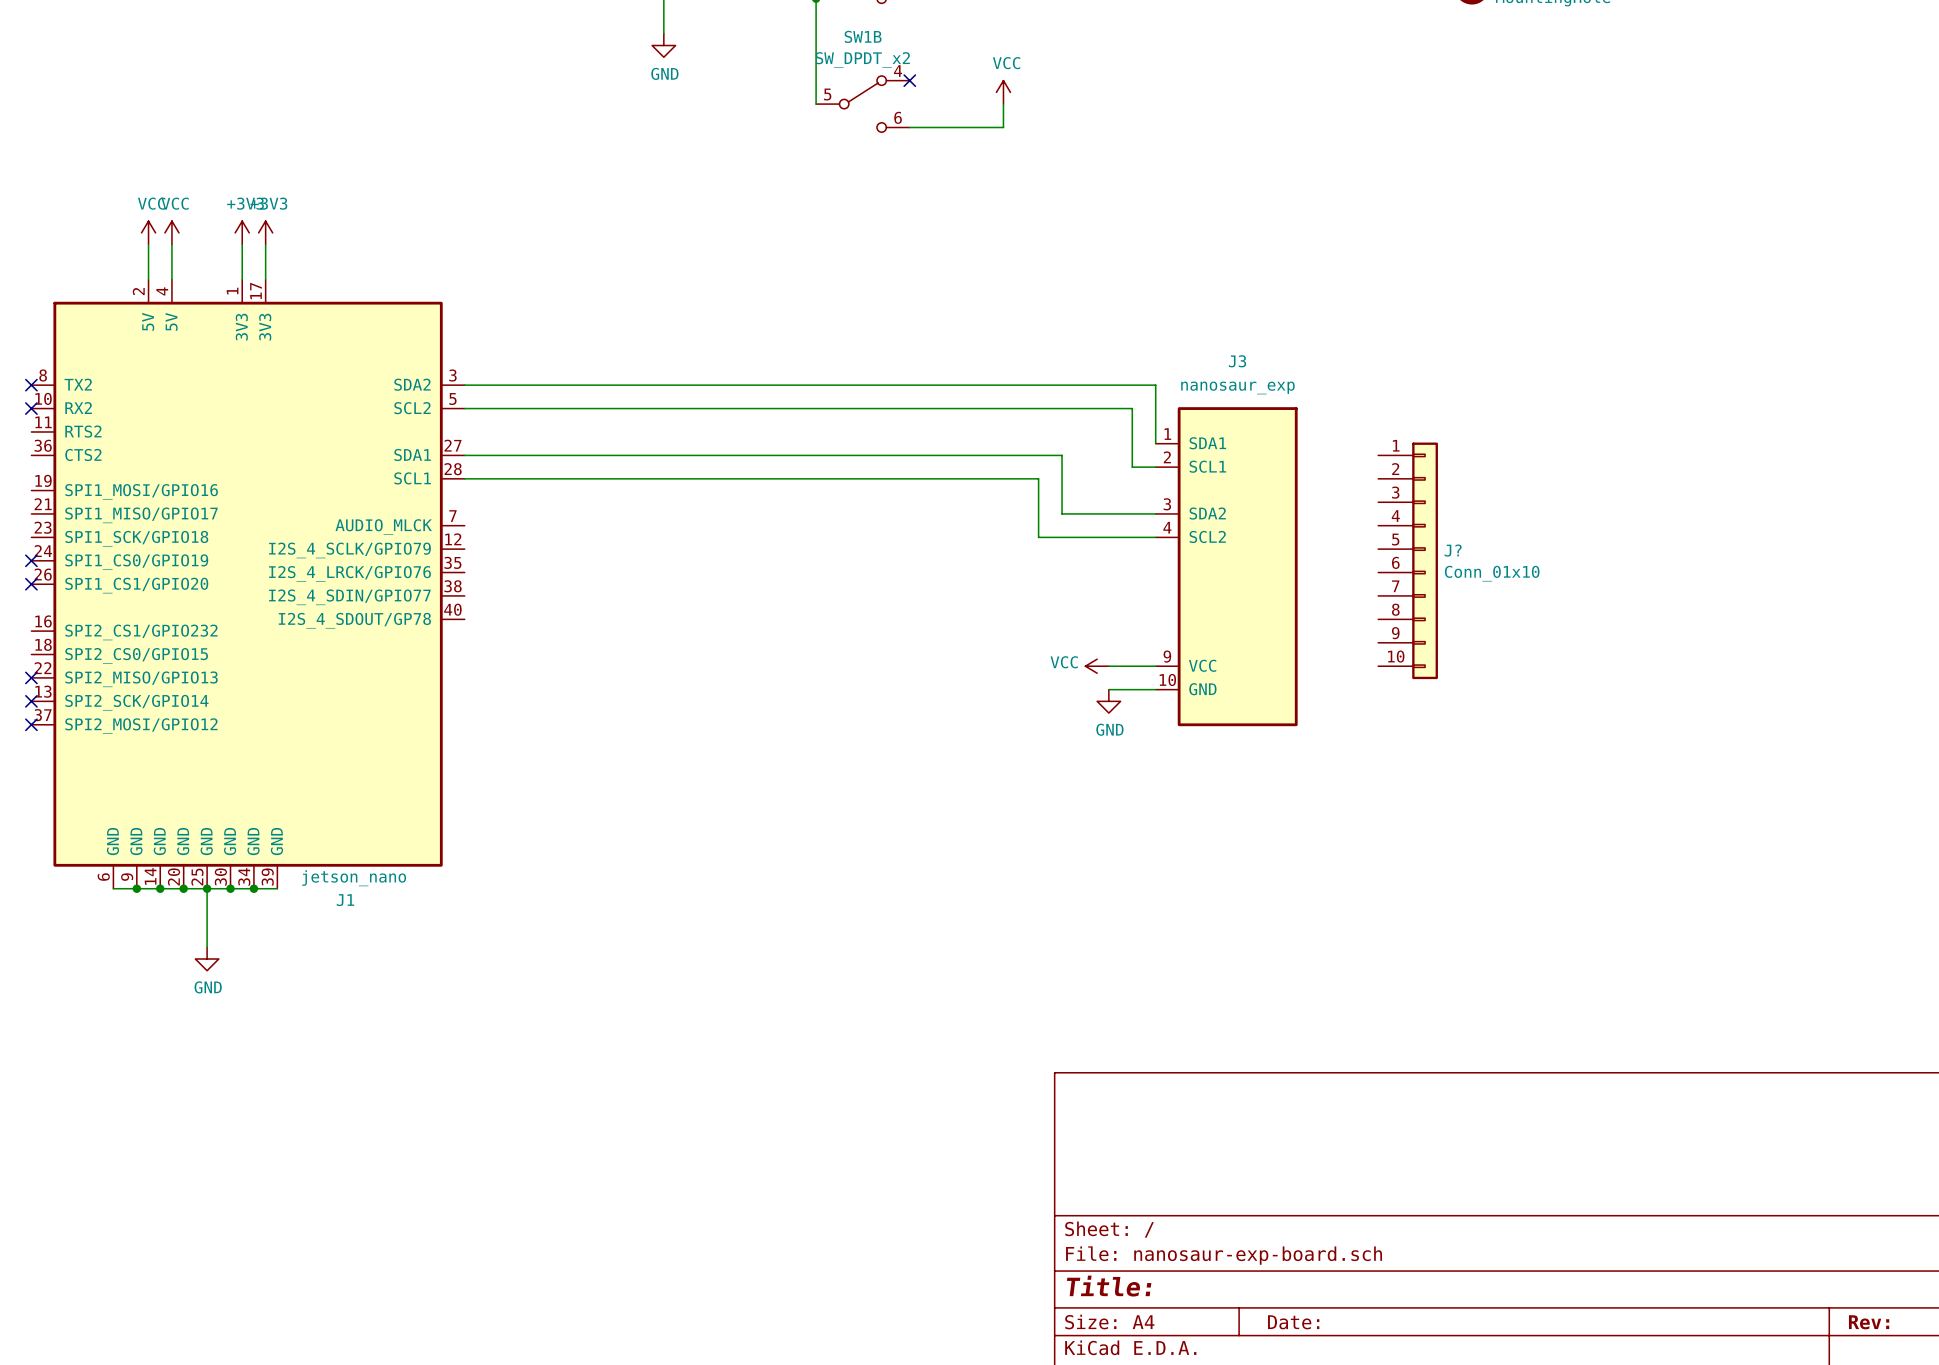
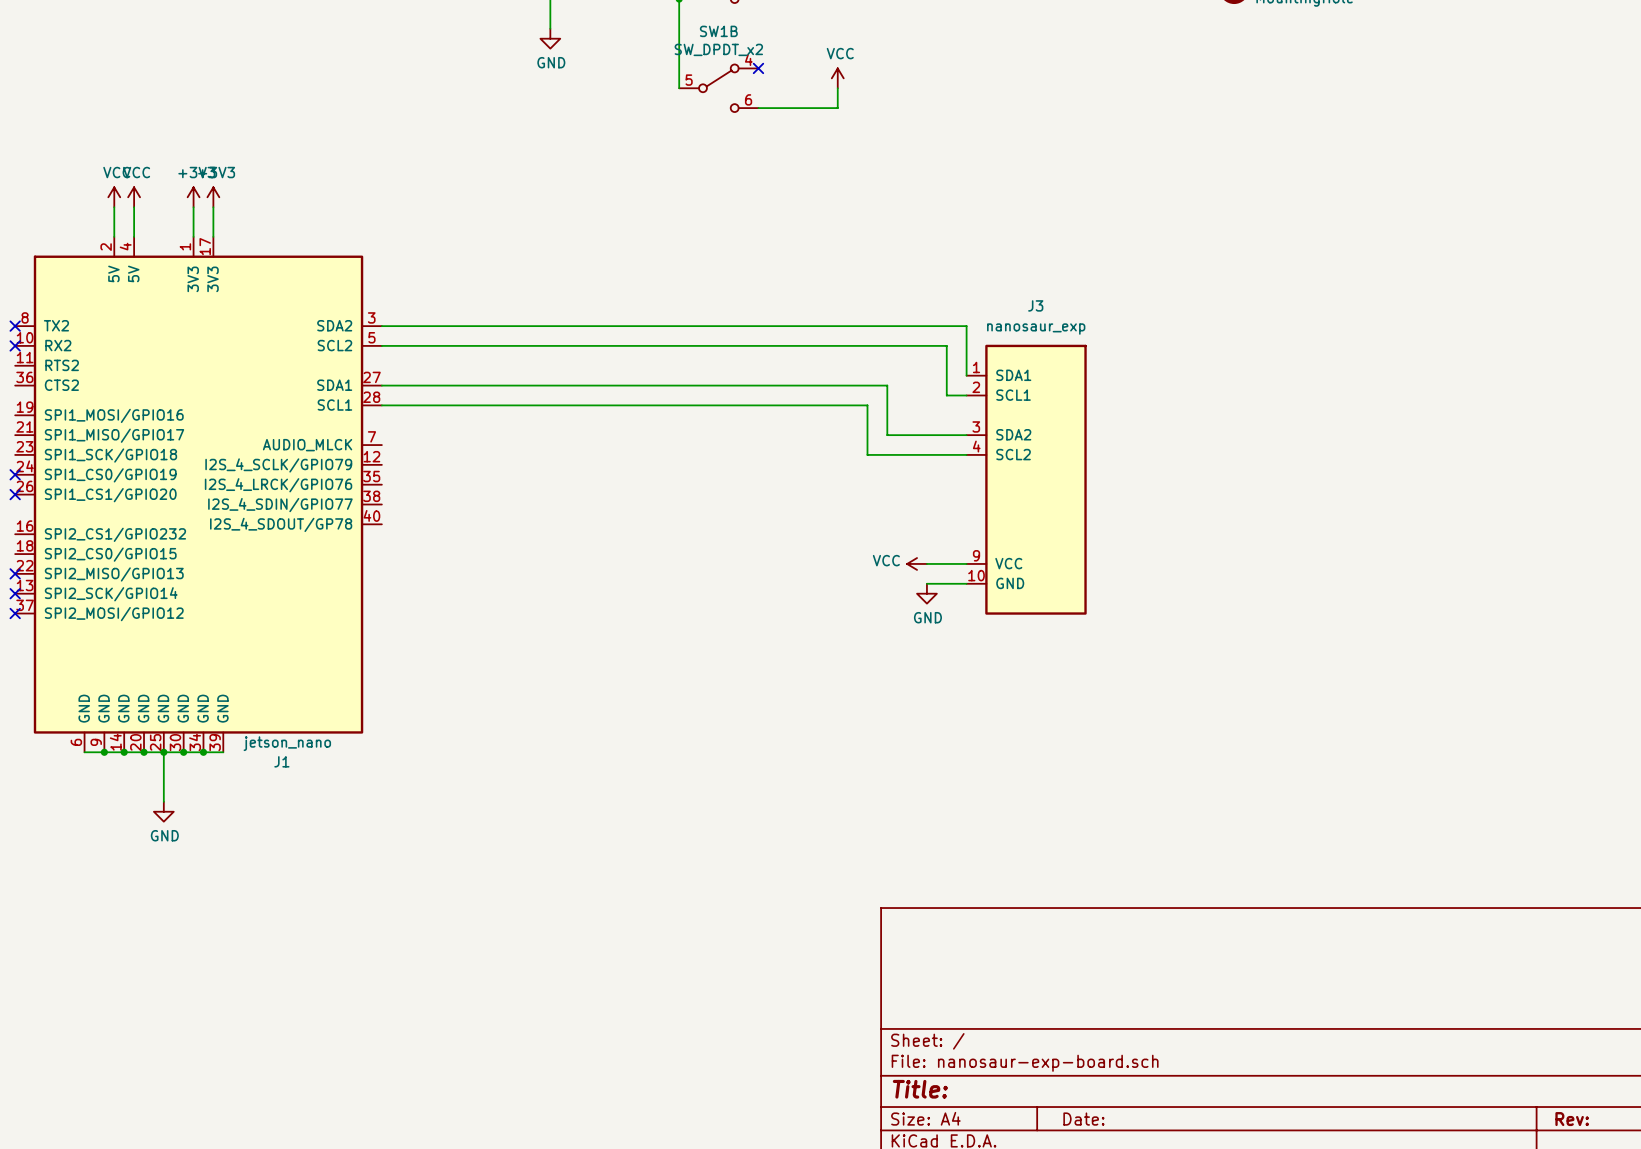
J?: Conn_01x10 (1408, 560) -> none

